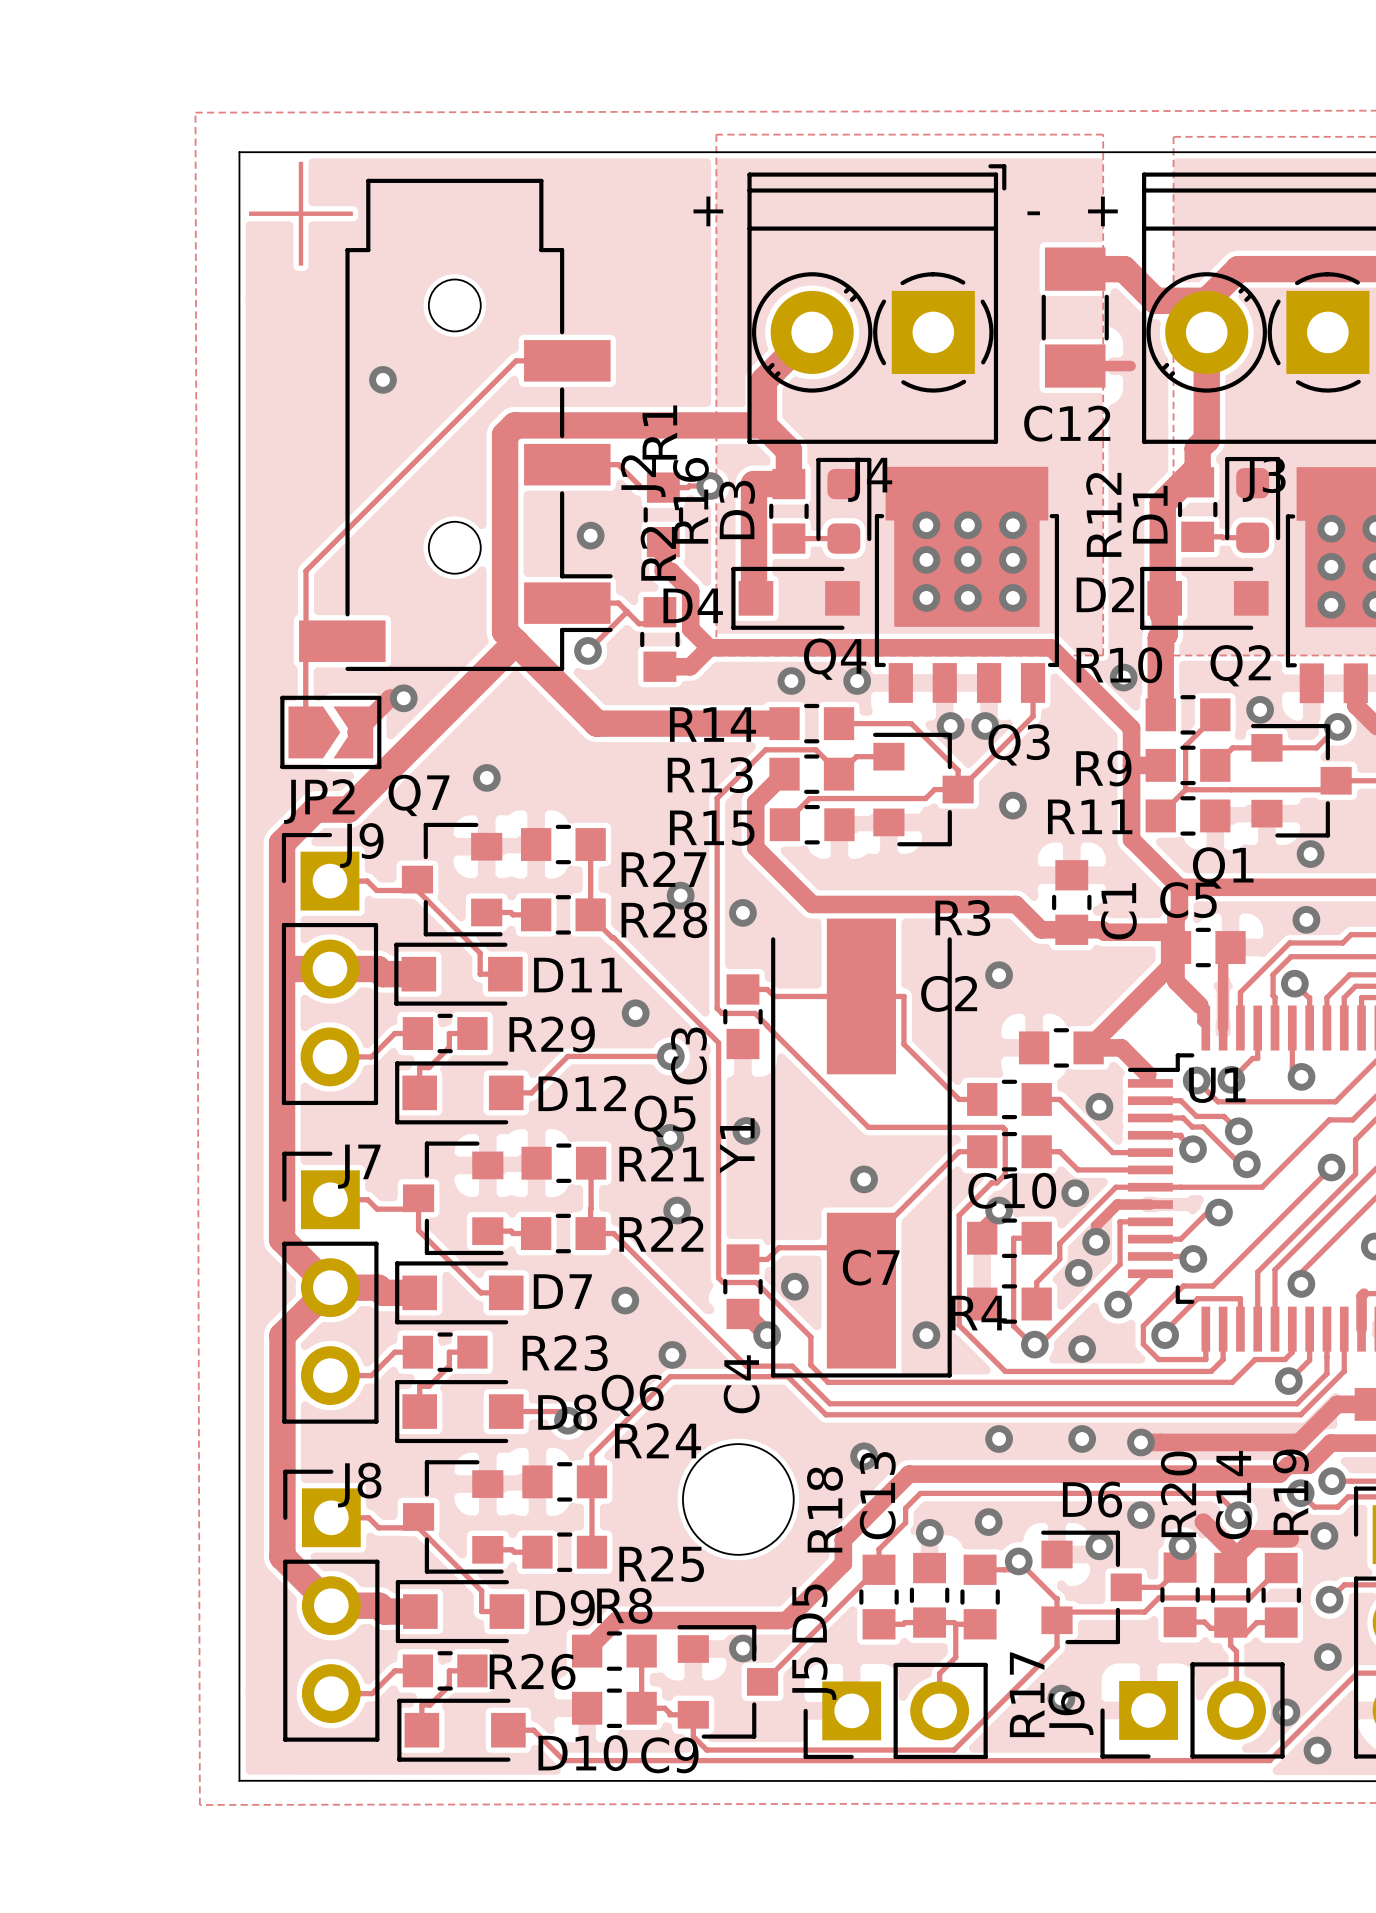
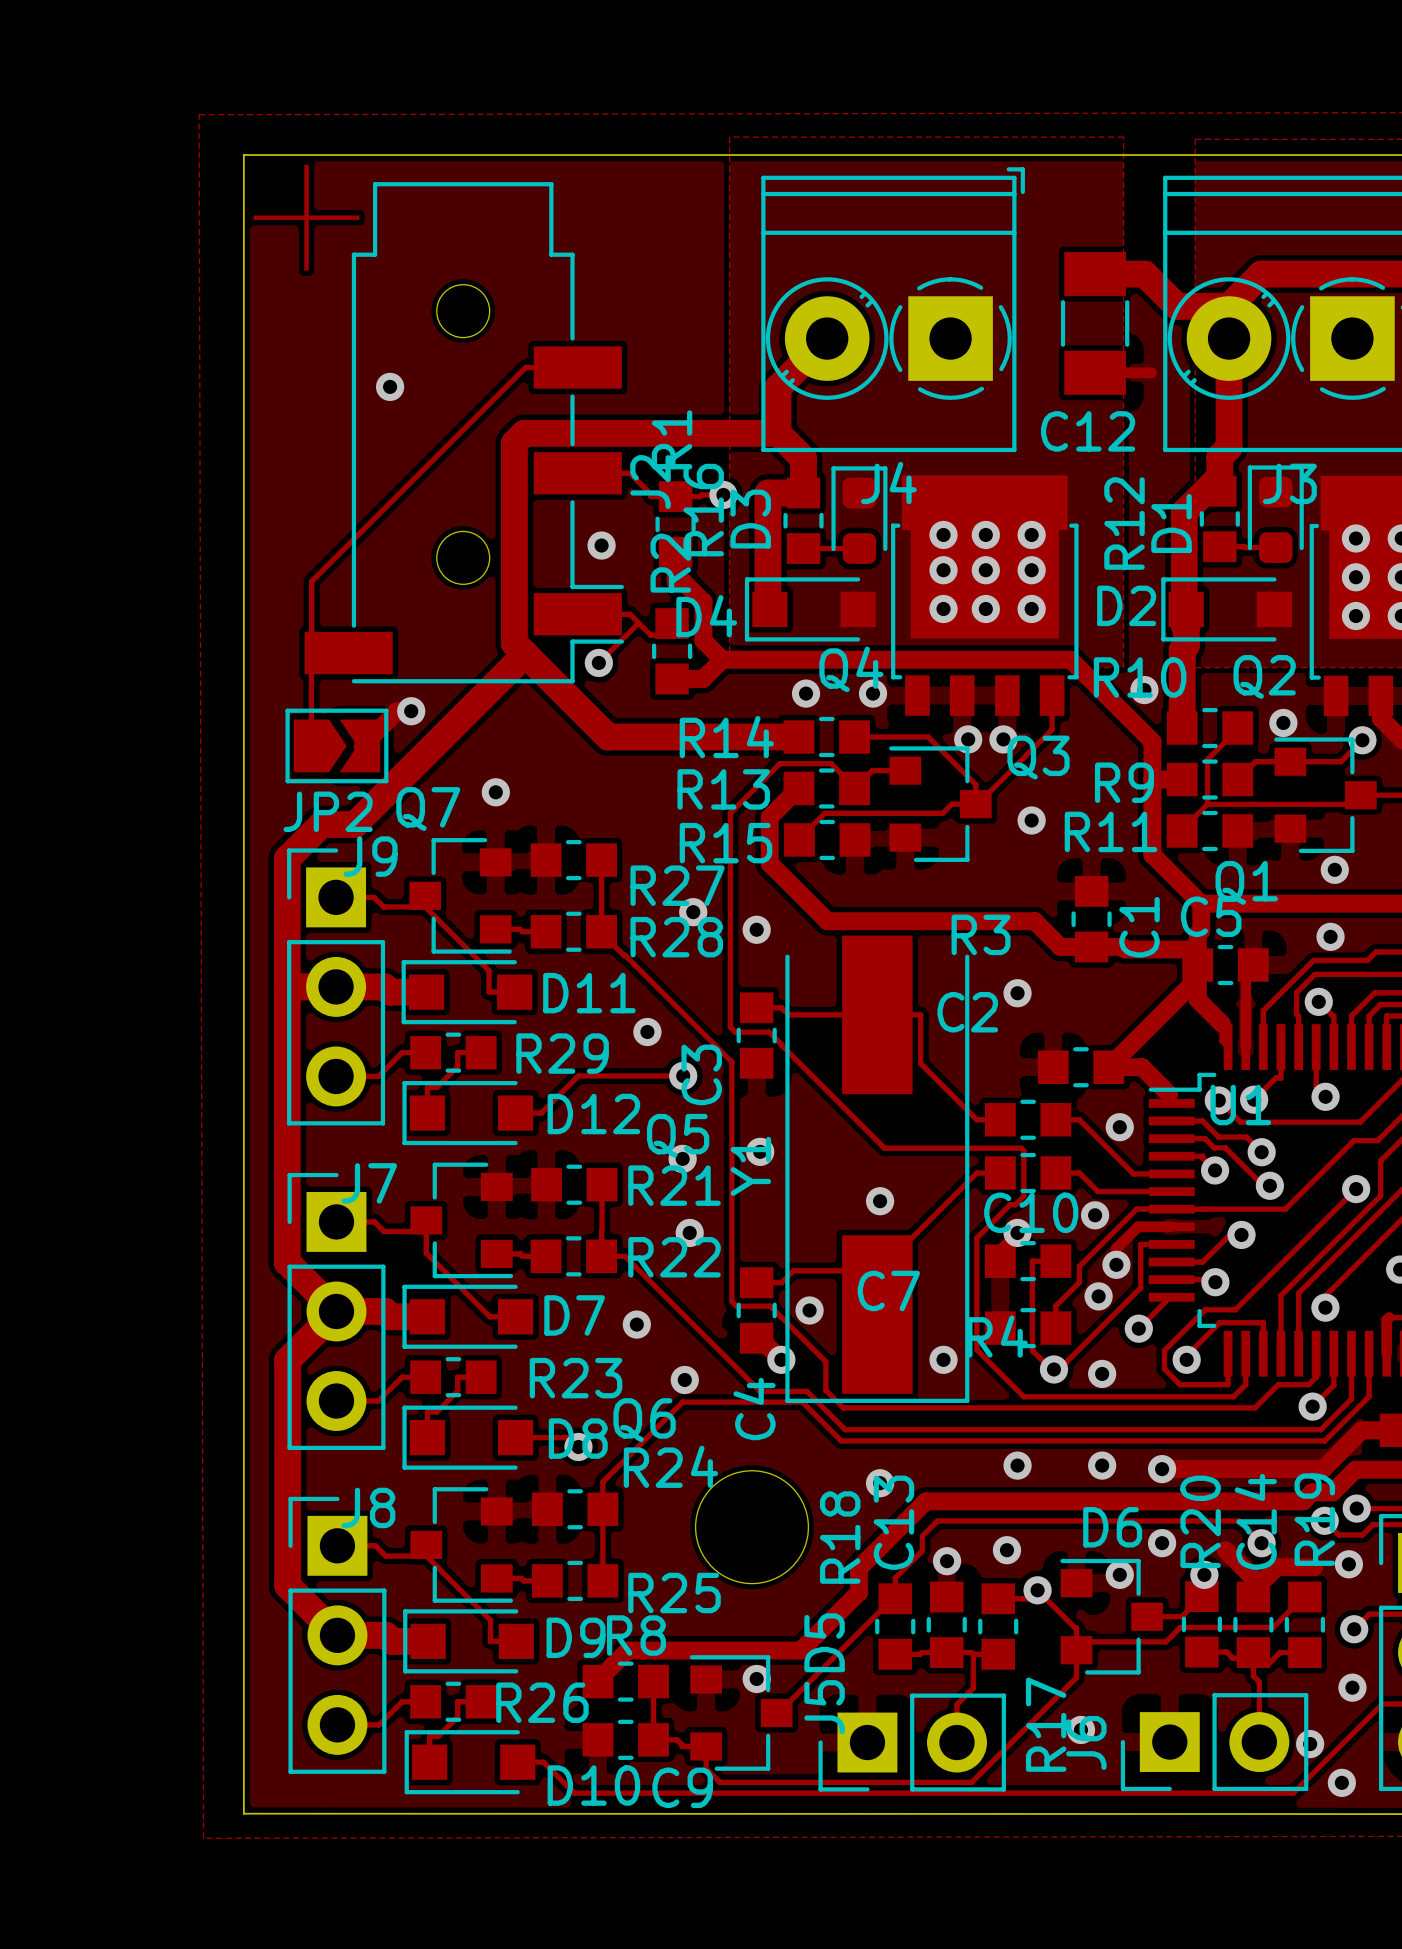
text: + (708, 211) -> none
text: + (1102, 211) -> none
text: - (1033, 213) -> none

